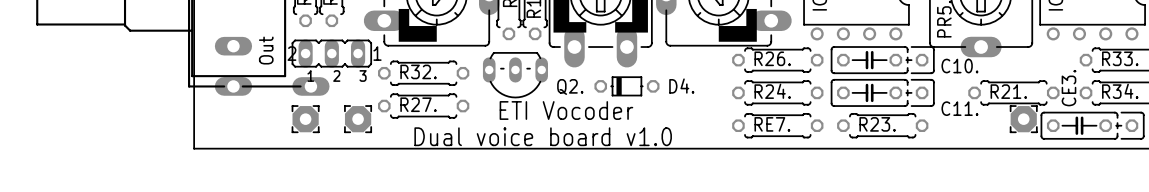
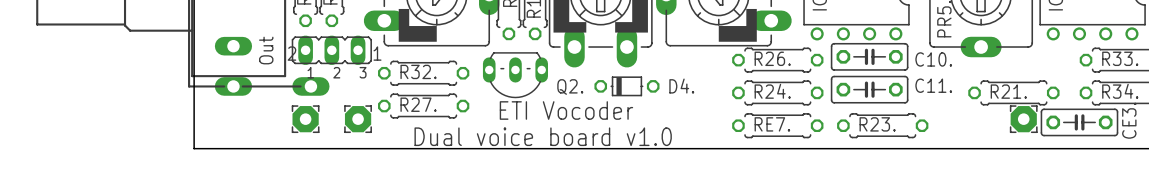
part footprint: [291, 39, 372, 68] -> [291, 35, 372, 65]
C10. footprint: [830, 46, 935, 75] -> [830, 42, 909, 71]
C11. footprint: [830, 79, 935, 107] -> [830, 75, 909, 104]
CE3. name position: CE3. (1068, 88) -> CE3. (1129, 120)
C11. name position: C11. (959, 108) -> C11. (933, 85)
CE3. footprint: [1040, 111, 1145, 140] -> [1040, 108, 1119, 137]

